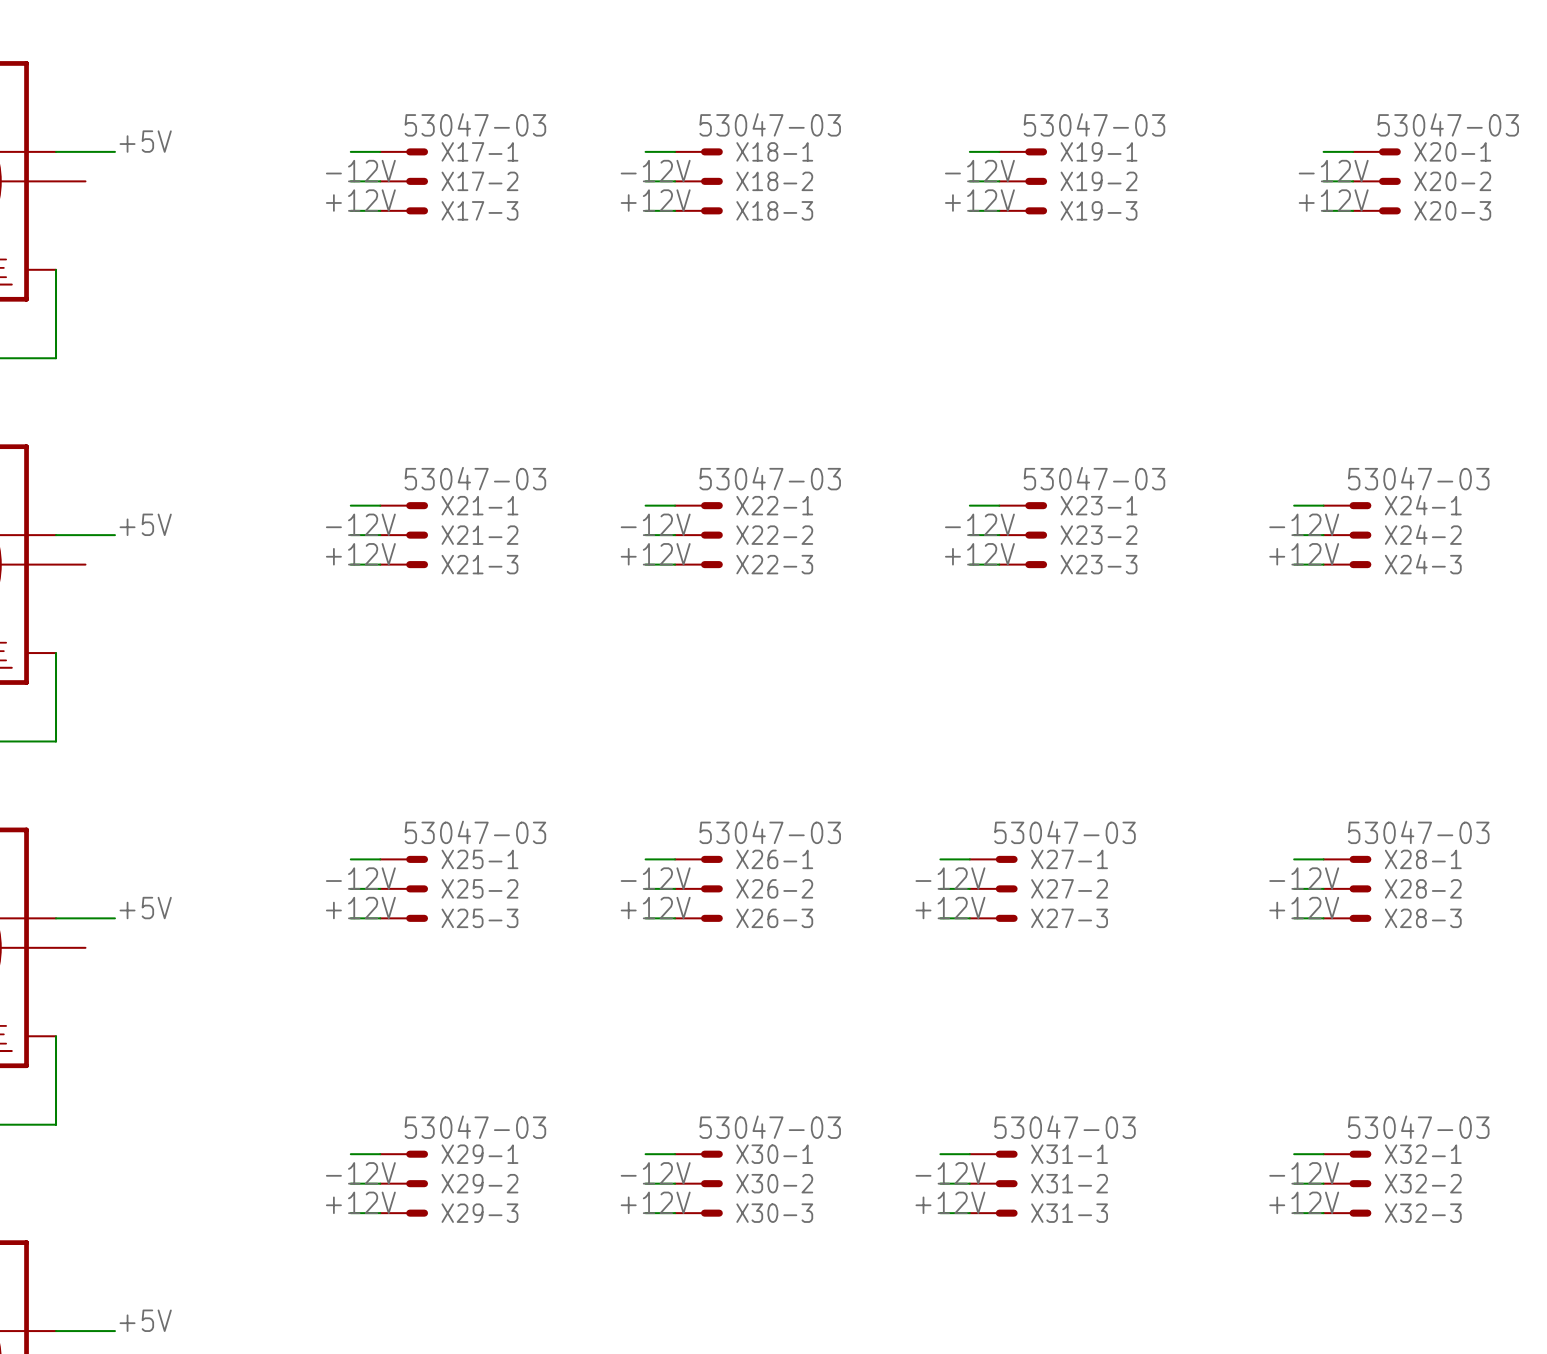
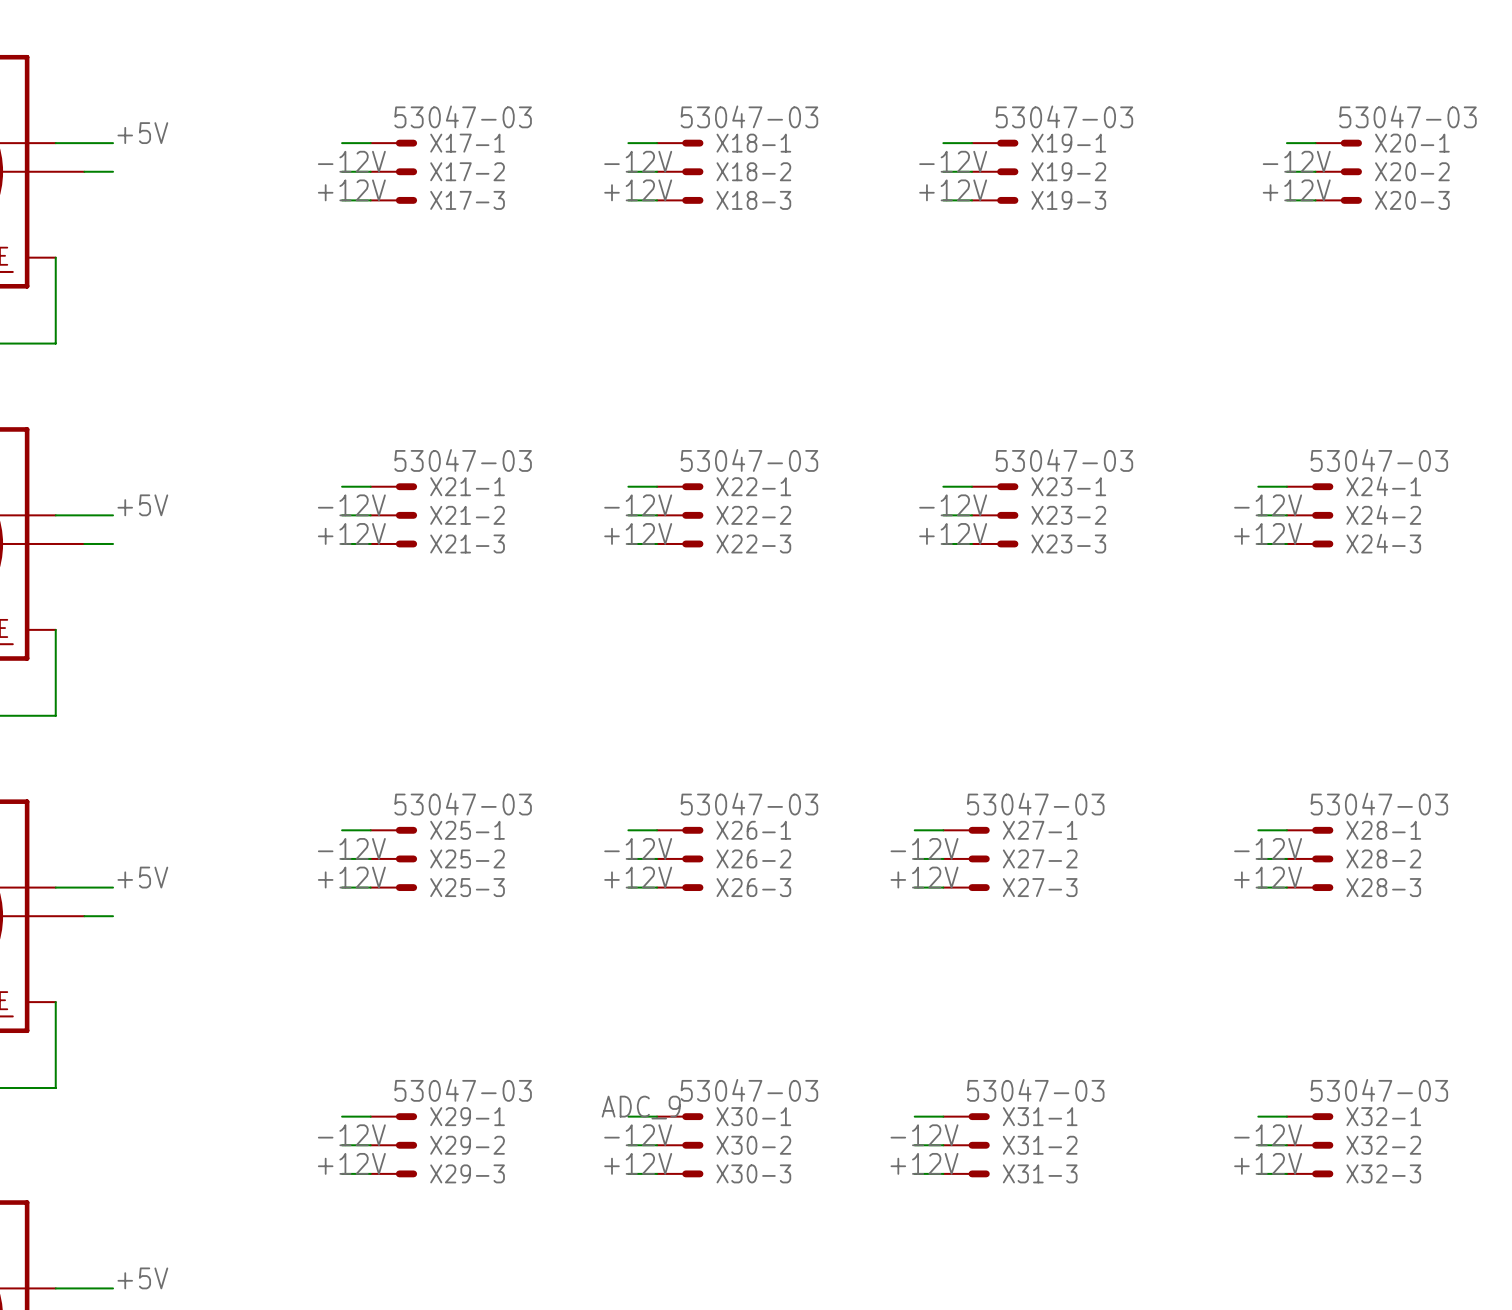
wire: none -> (84, 171) (113, 171)
wire: none -> (84, 543) (113, 543)
wire: none -> (84, 916) (113, 916)
label: none -> ADC_9 (641, 1107)

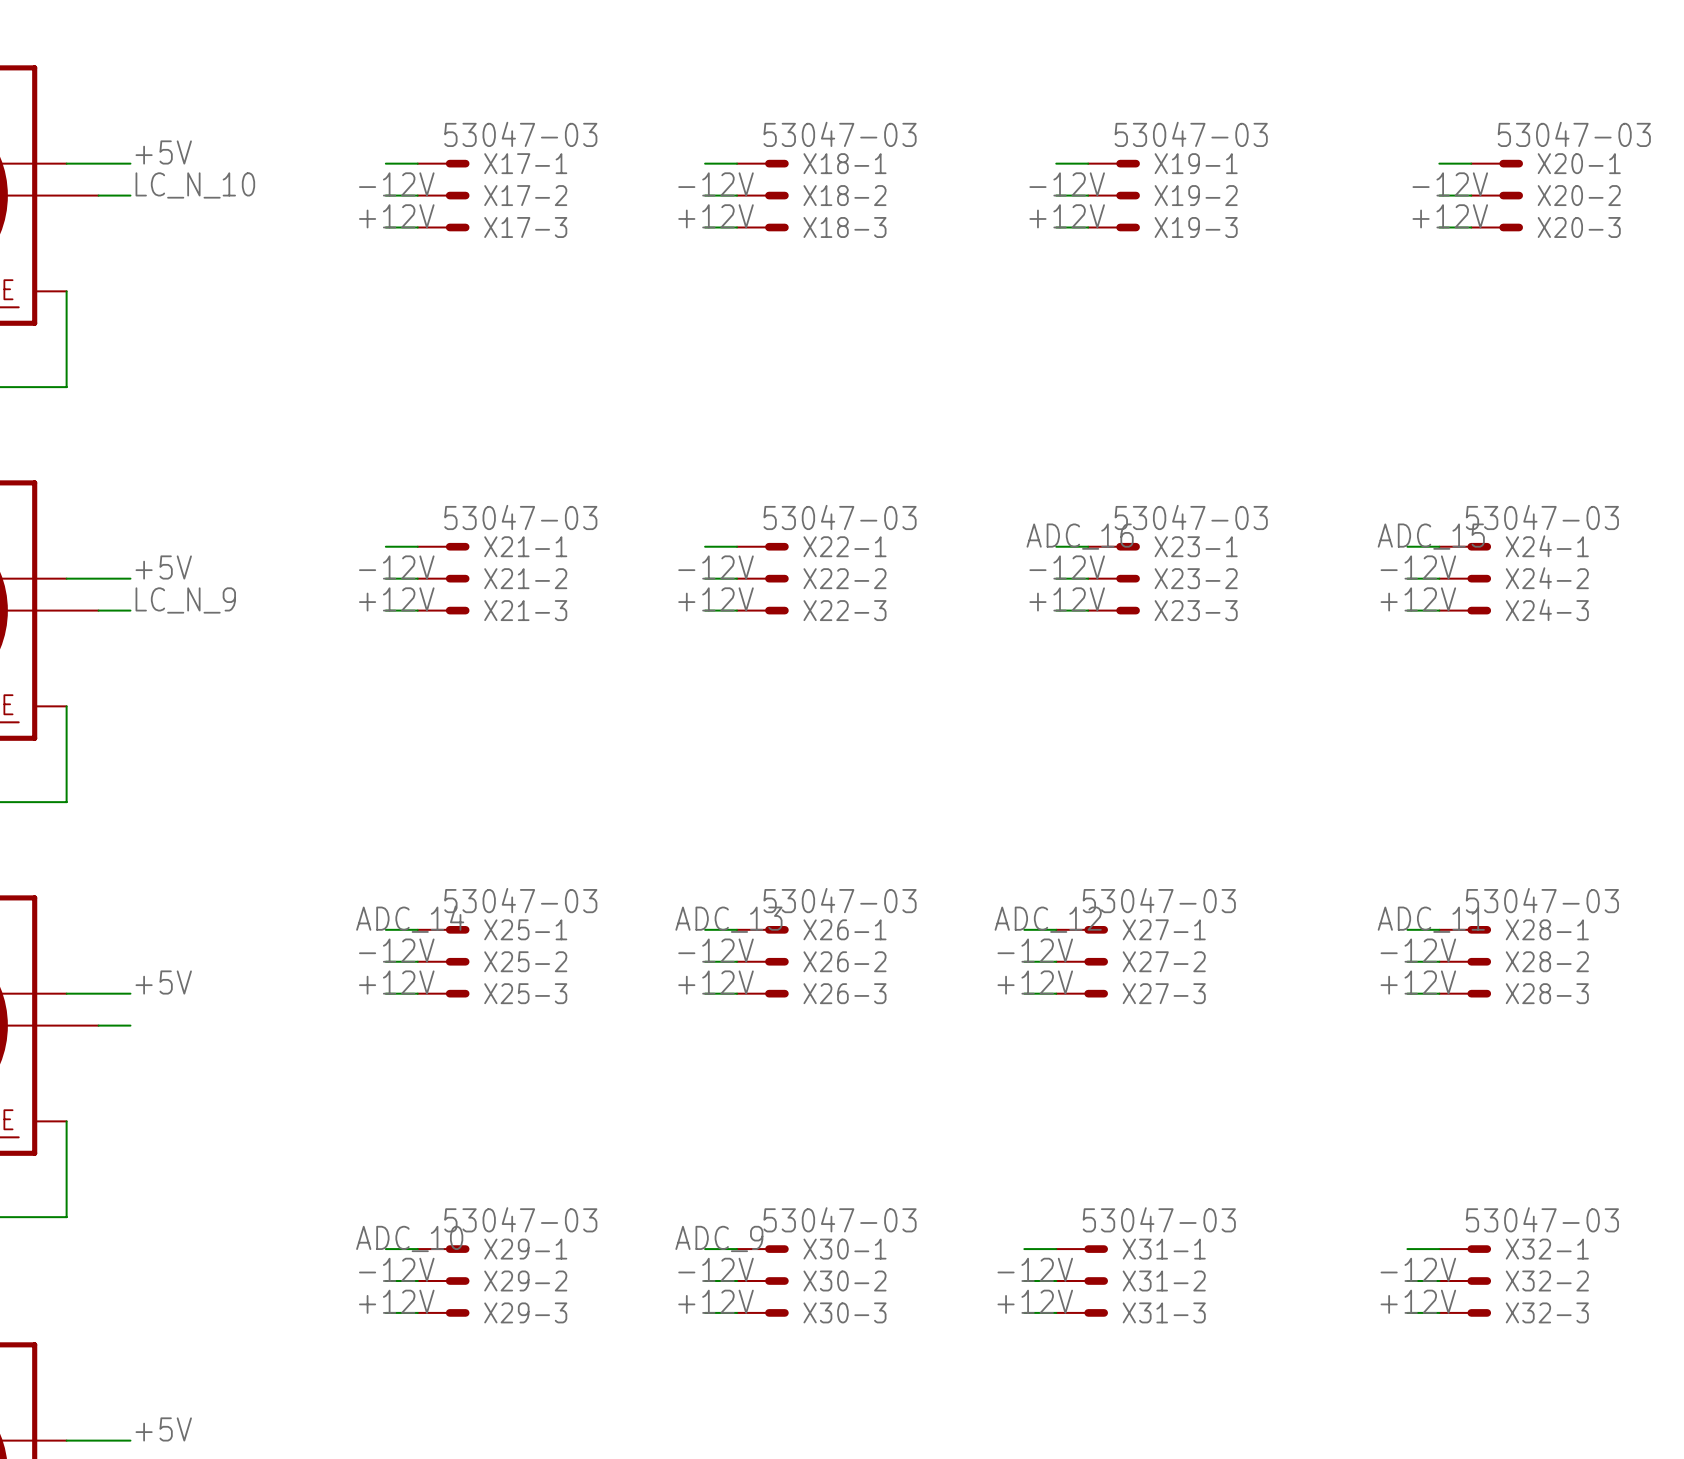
label: none -> LC_N_10 (195, 185)
label: none -> ADC_16 (1080, 536)
label: none -> ADC_15 (1431, 536)
label: none -> LC_N_9 (185, 600)
label: none -> ADC_14 (410, 919)
label: none -> ADC_13 (728, 919)
label: none -> ADC_12 (1048, 919)
label: none -> ADC_11 (1431, 919)
label: none -> ADC_10 (409, 1238)

